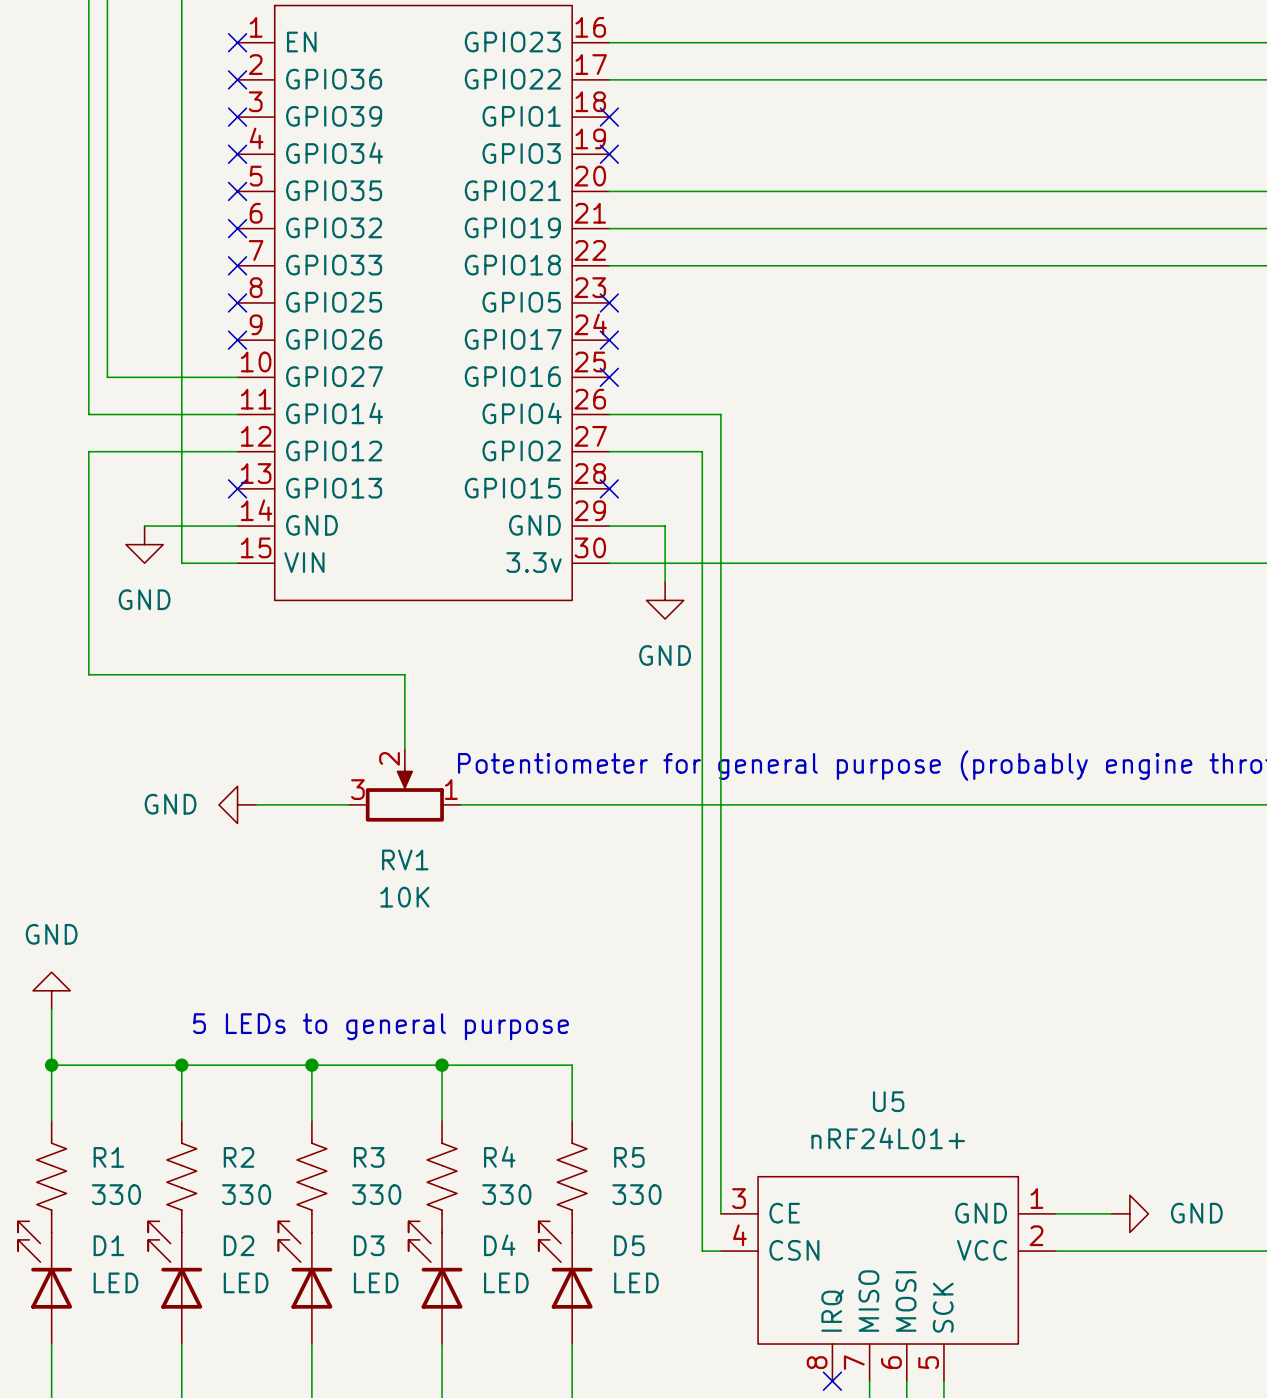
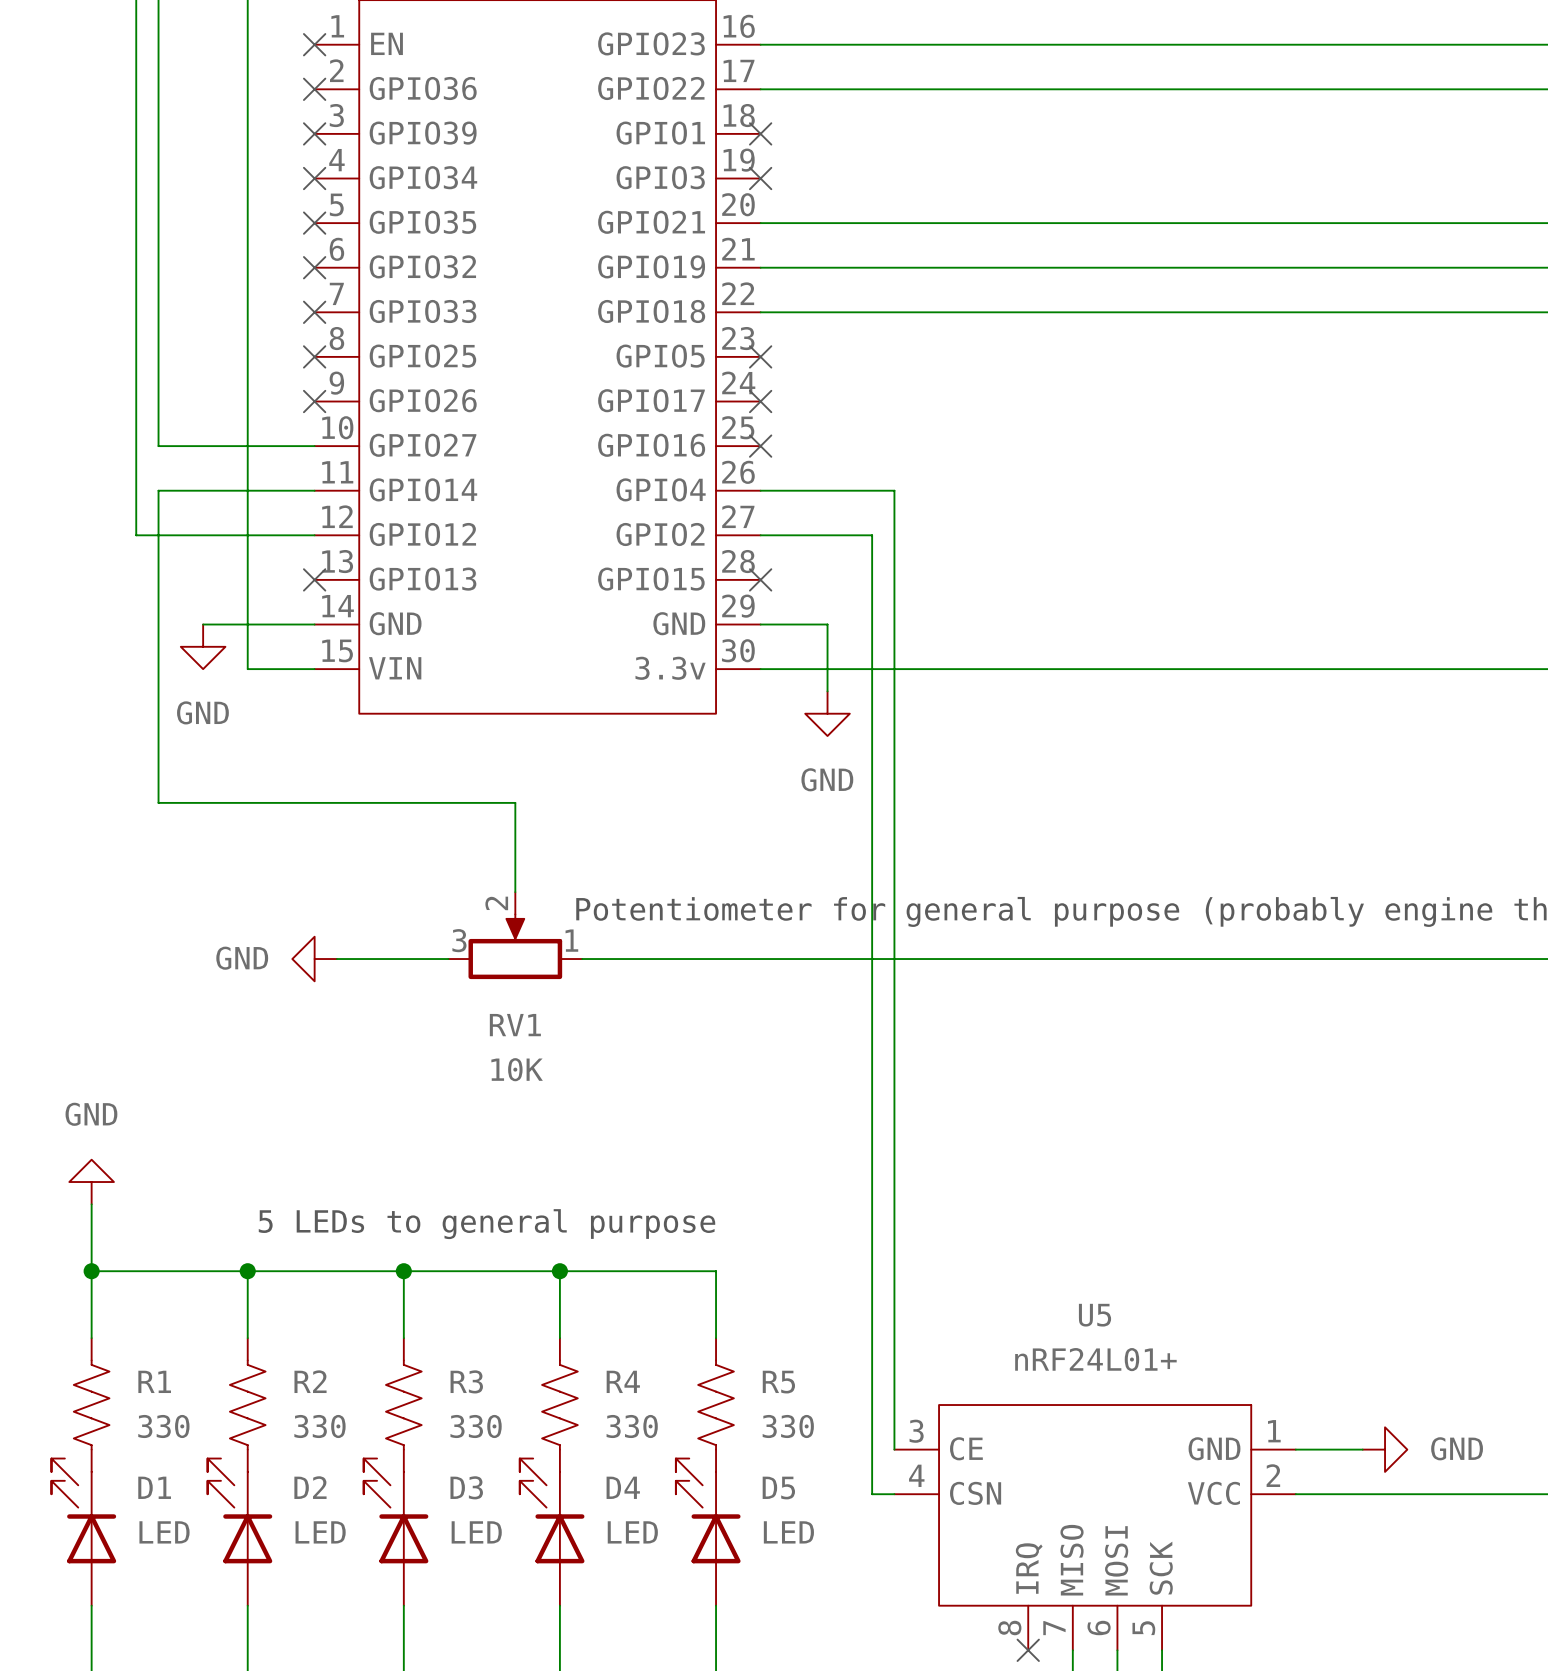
wire: (88, 414) (107, 414) -> (136, 490) (136, 535)
wire: (88, 451) (88, 674) (107, 674) -> (158, 490) (158, 802)

